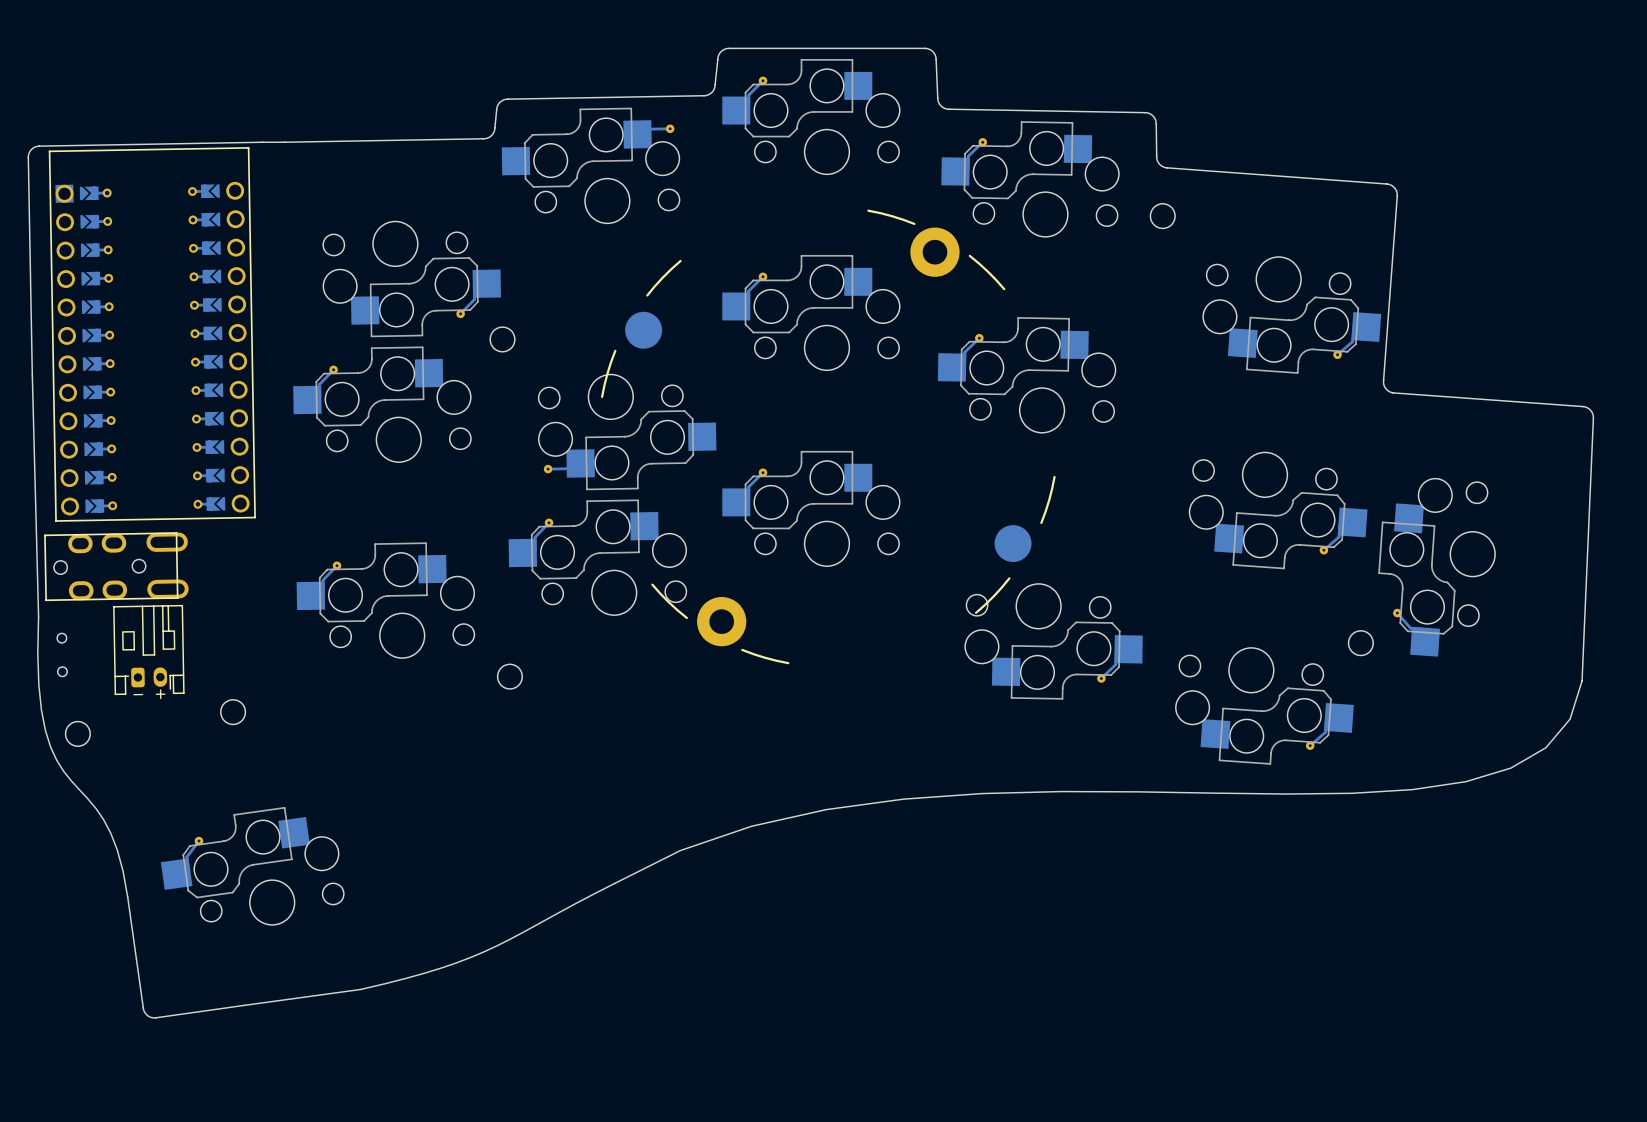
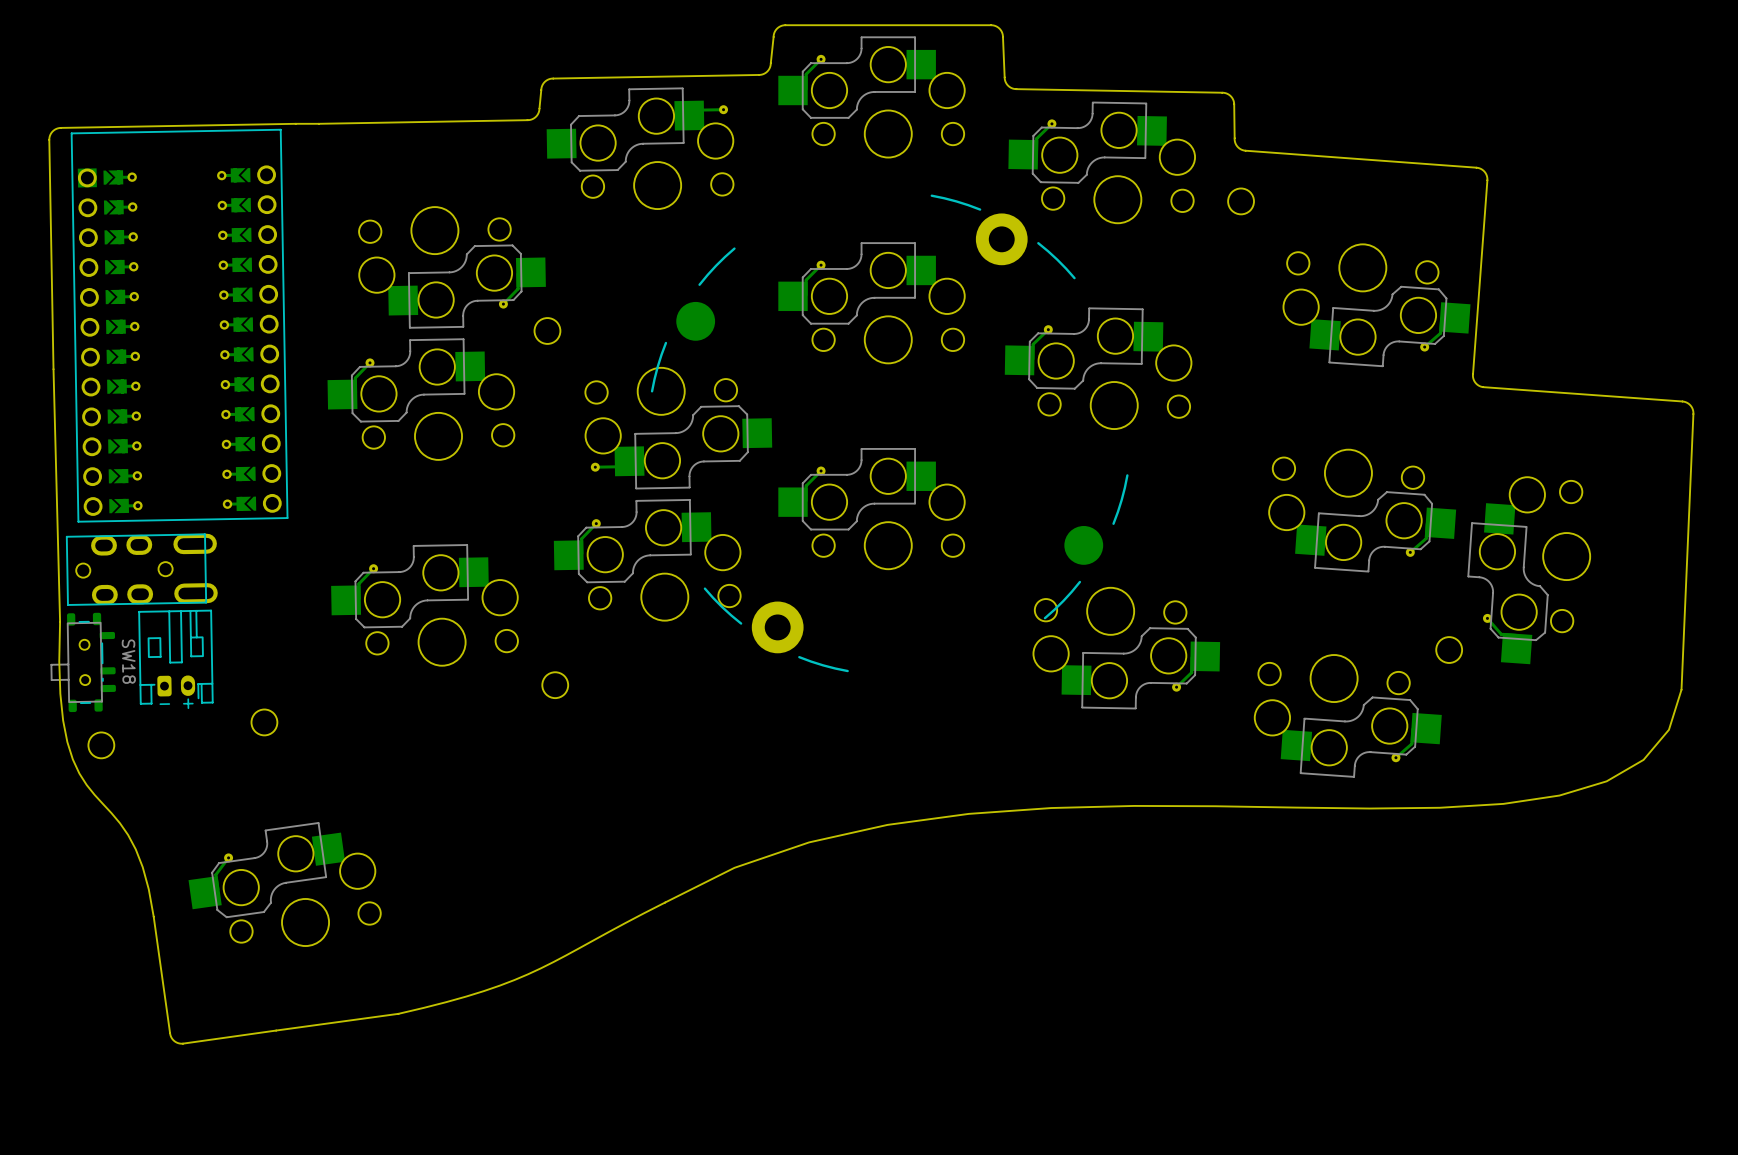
SW18: none -> (83, 662)

